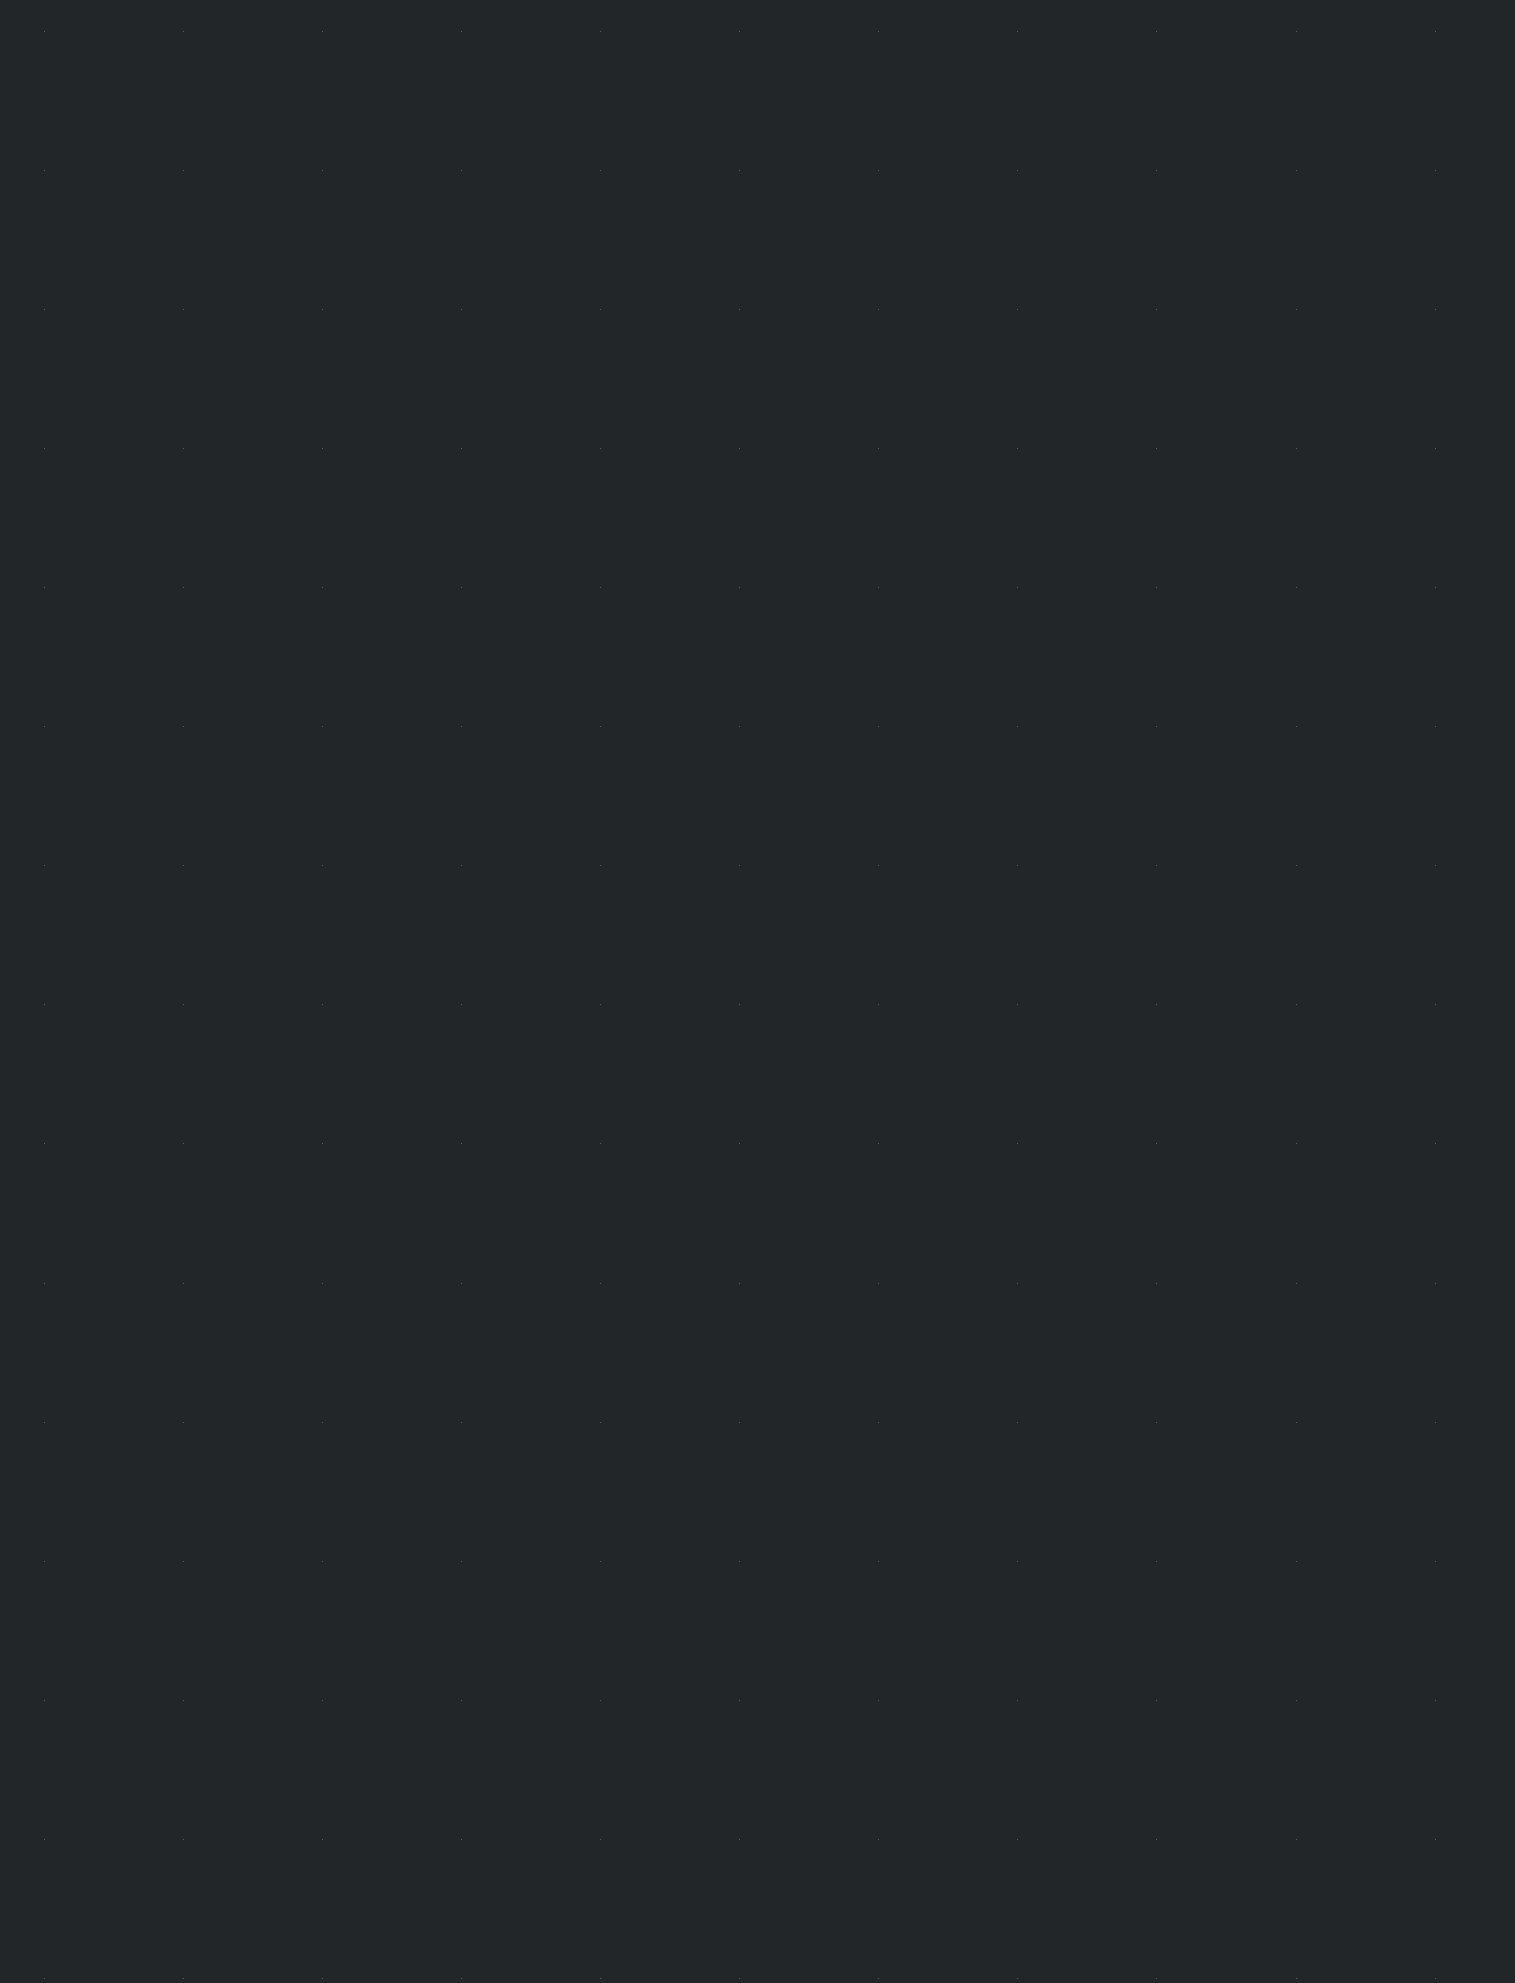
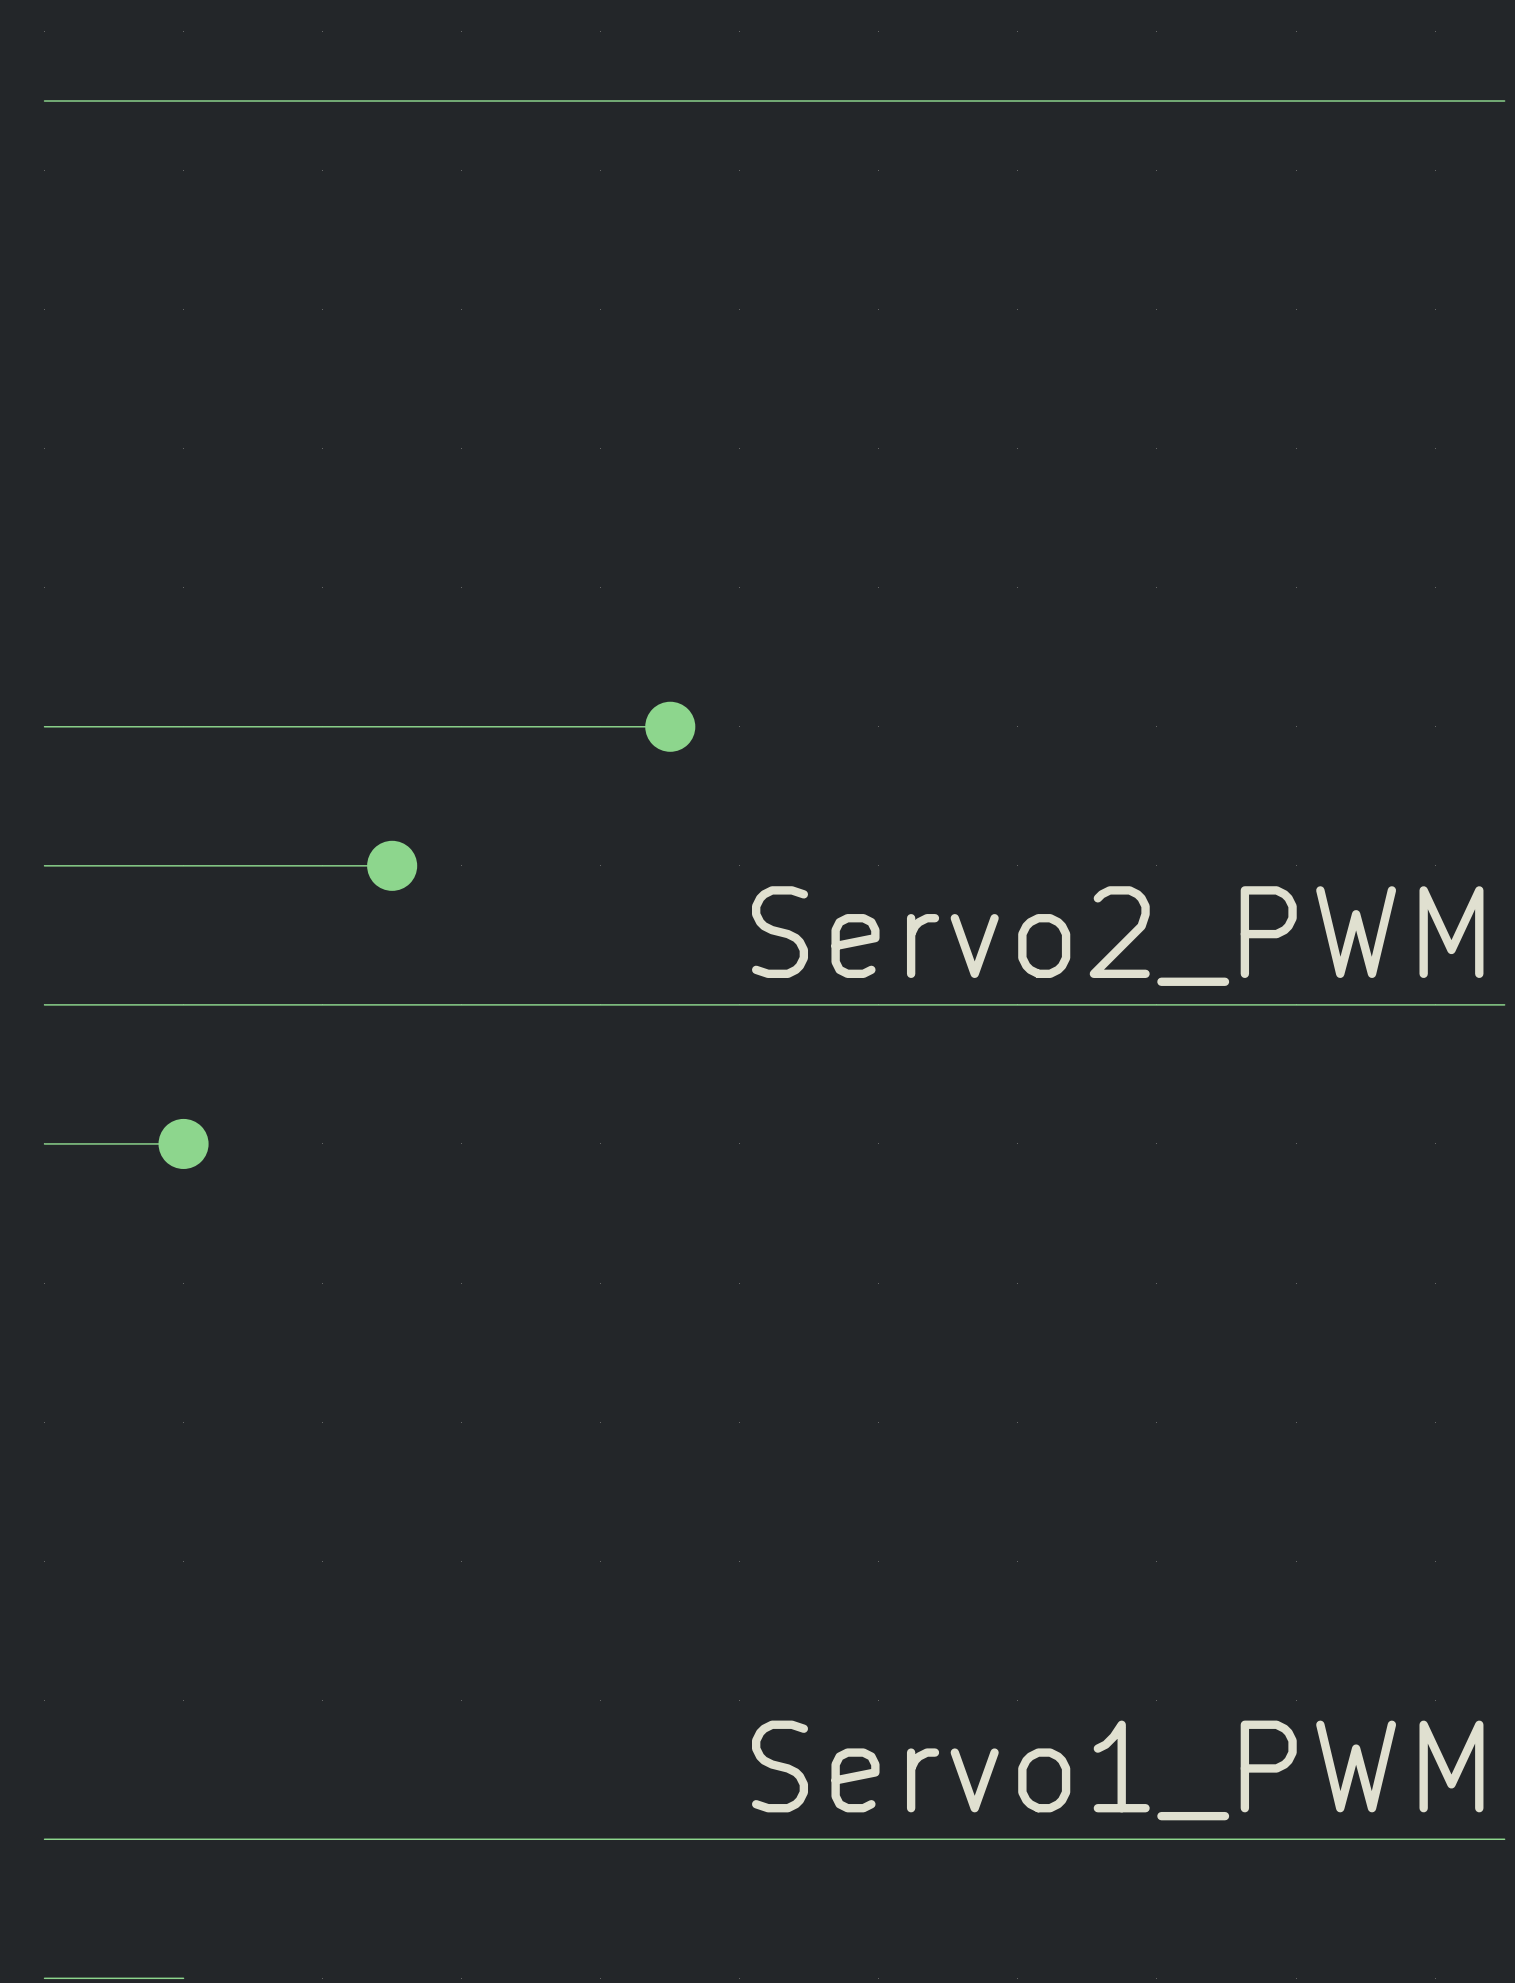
wire: none -> (44, 101) (1504, 101)
wire: none -> (44, 726) (670, 726)
junction: none -> (670, 726)
wire: none -> (44, 865) (392, 865)
junction: none -> (392, 865)
label: none -> Servo2_PWM (1117, 936)
wire: none -> (44, 1004) (1504, 1004)
wire: none -> (44, 1143) (183, 1143)
junction: none -> (183, 1143)
label: none -> Servo1_PWM (1117, 1770)
wire: none -> (44, 1839) (1504, 1839)
wire: none -> (44, 1978) (183, 1978)

